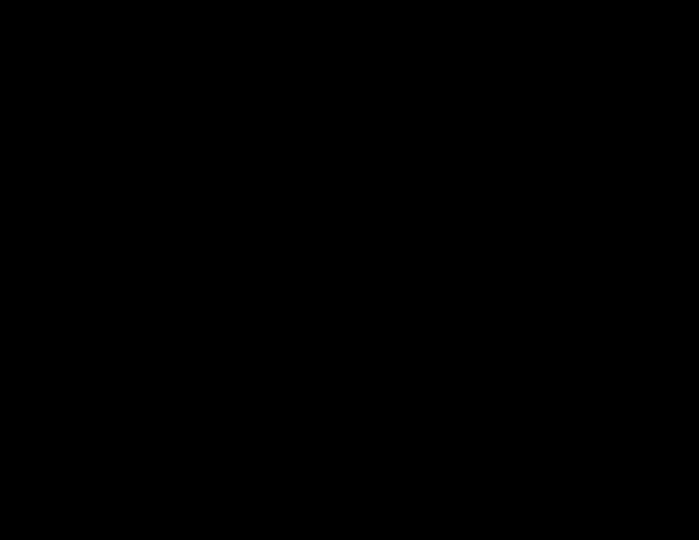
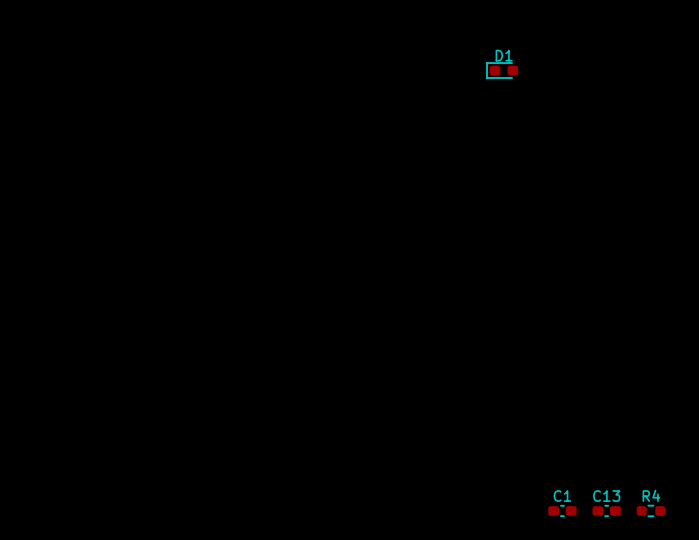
D1: none -> (502, 70)
C1: none -> (562, 510)
C13: none -> (606, 510)
R4: none -> (650, 510)

